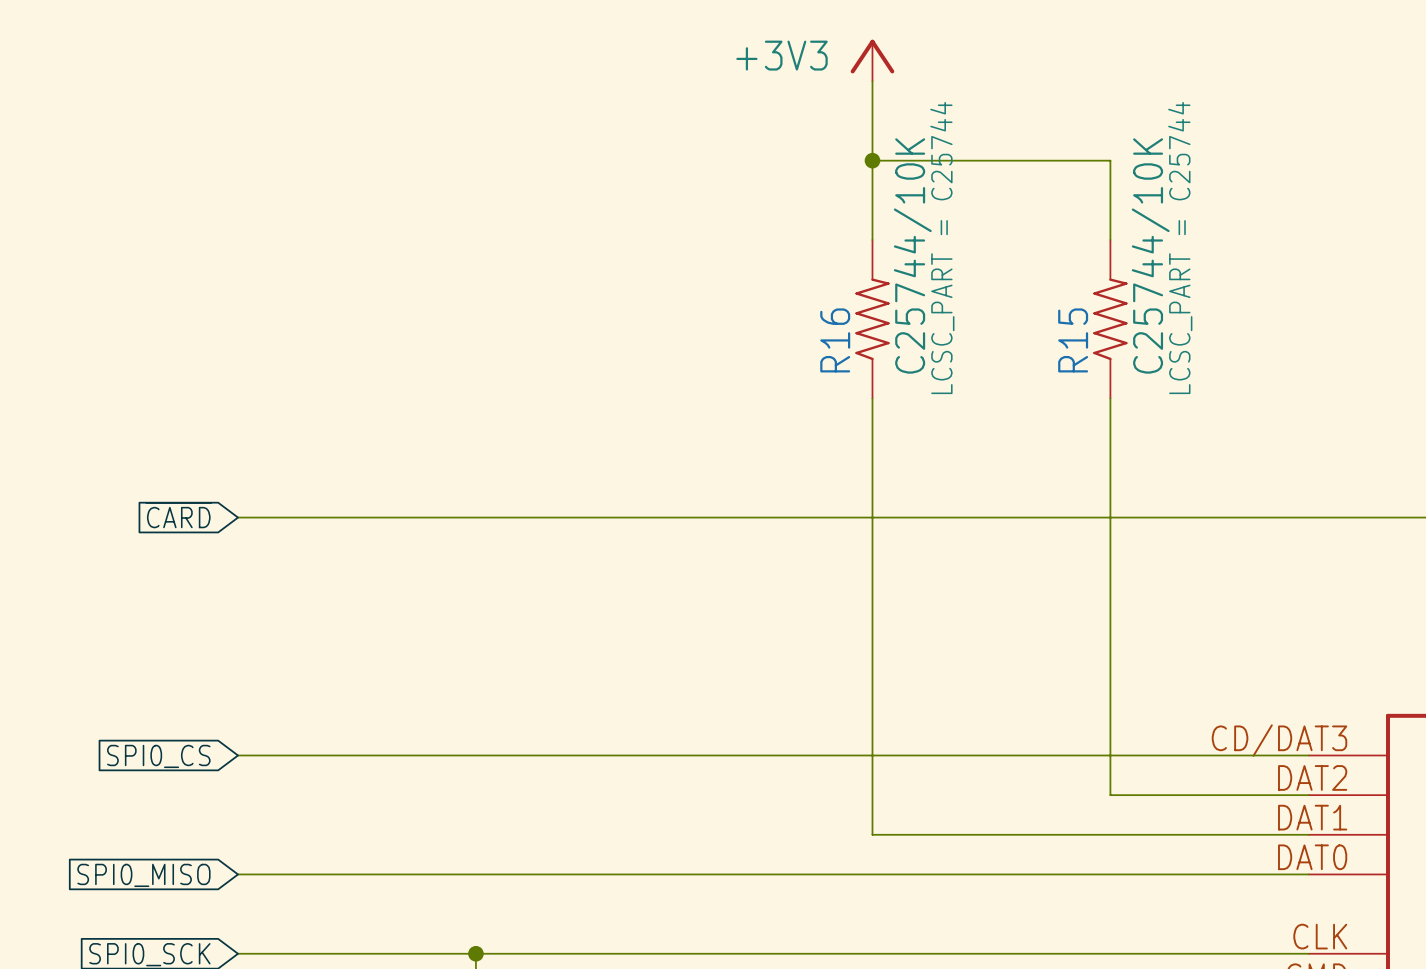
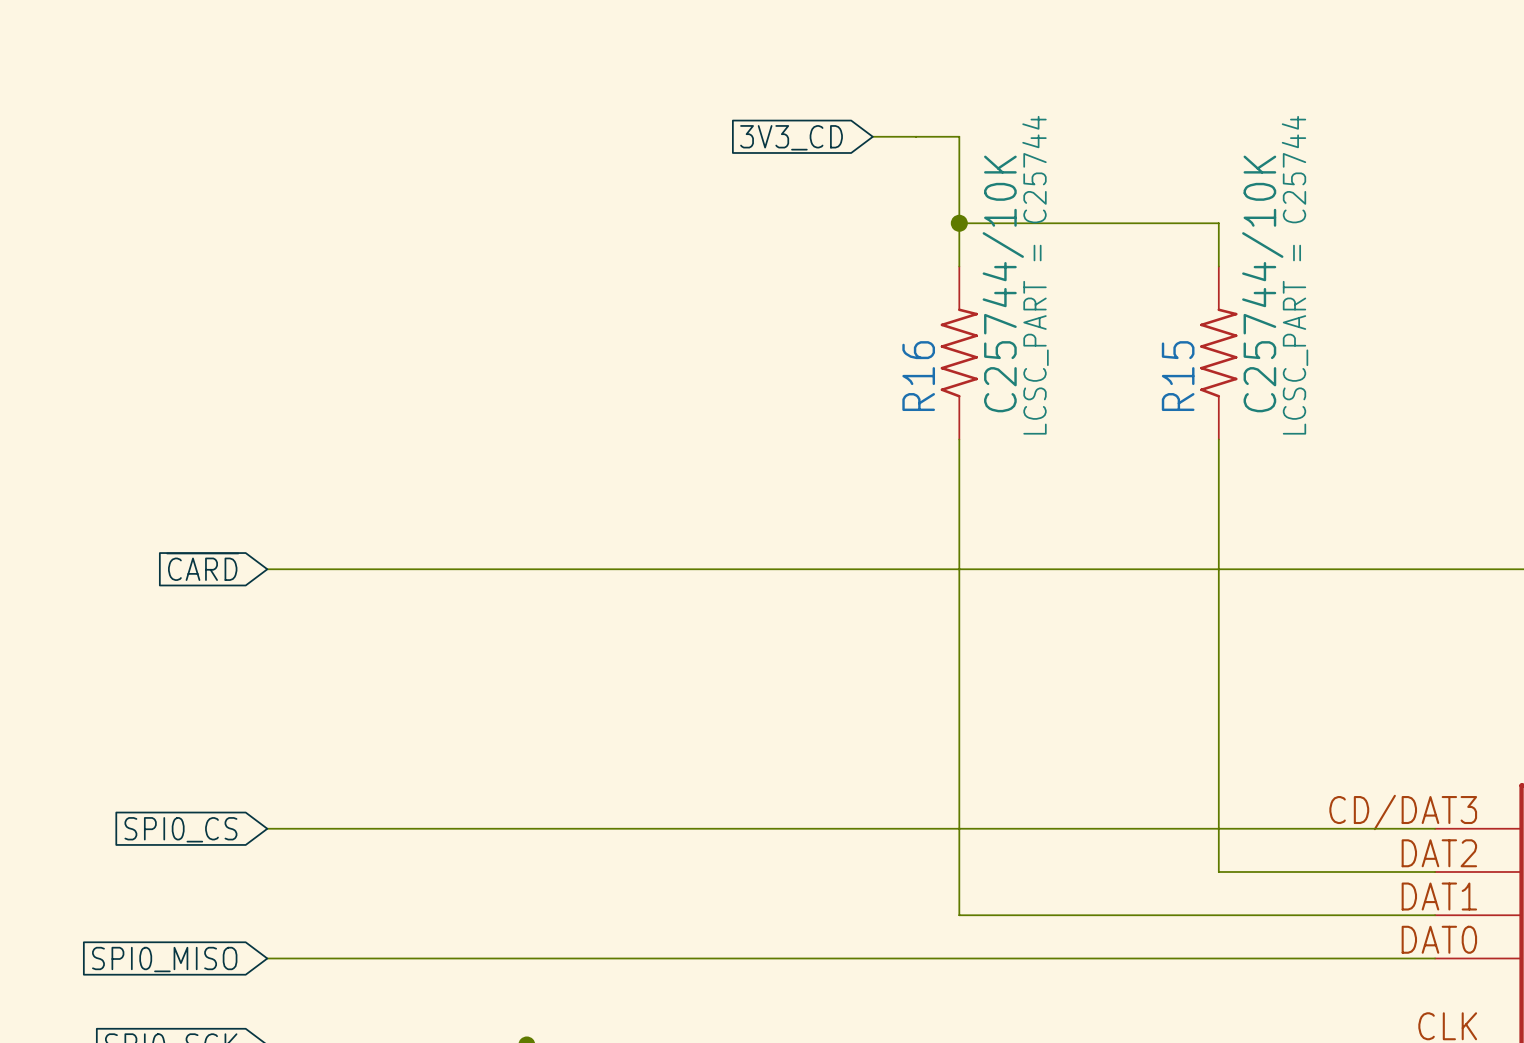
power symbol: +3V3 (872, 60) -> none
wire: (872, 81) (872, 121) -> (872, 136) (959, 136)
global label: none -> 3V3_CD (791, 137)
wire: (872, 160) (1110, 160) (1110, 200) -> (959, 223) (1218, 223)
junction position: (872, 160) -> (959, 223)

